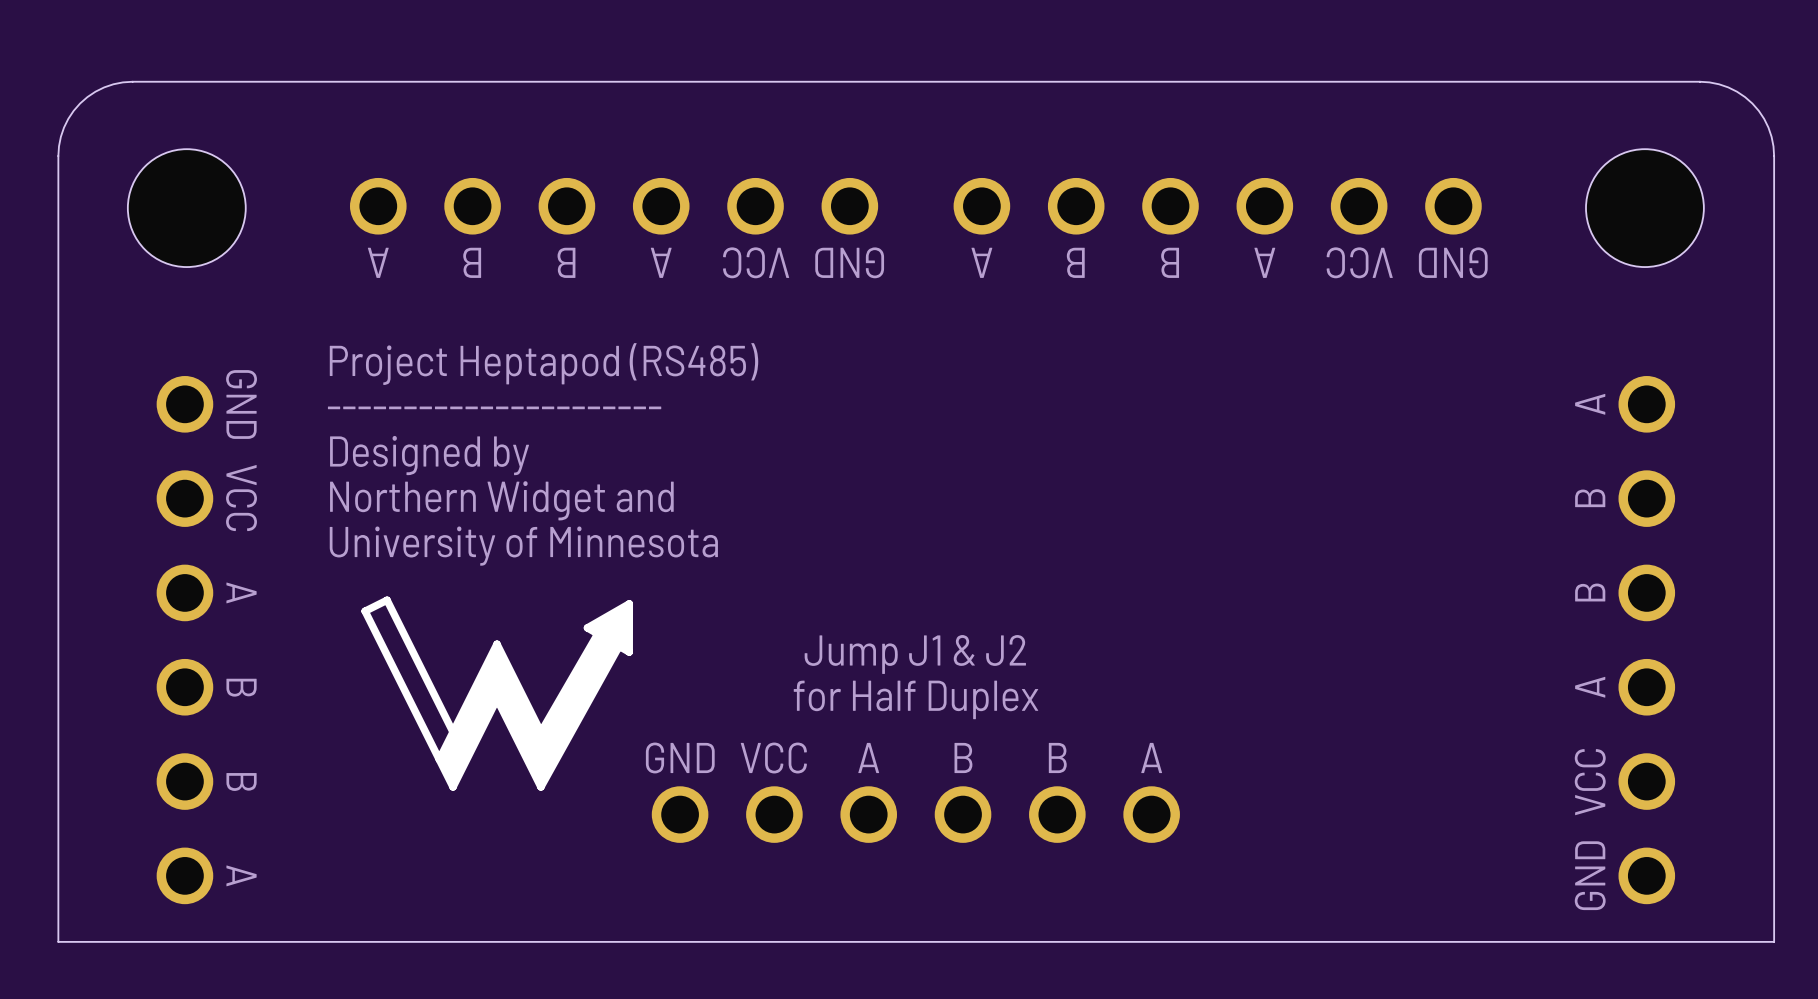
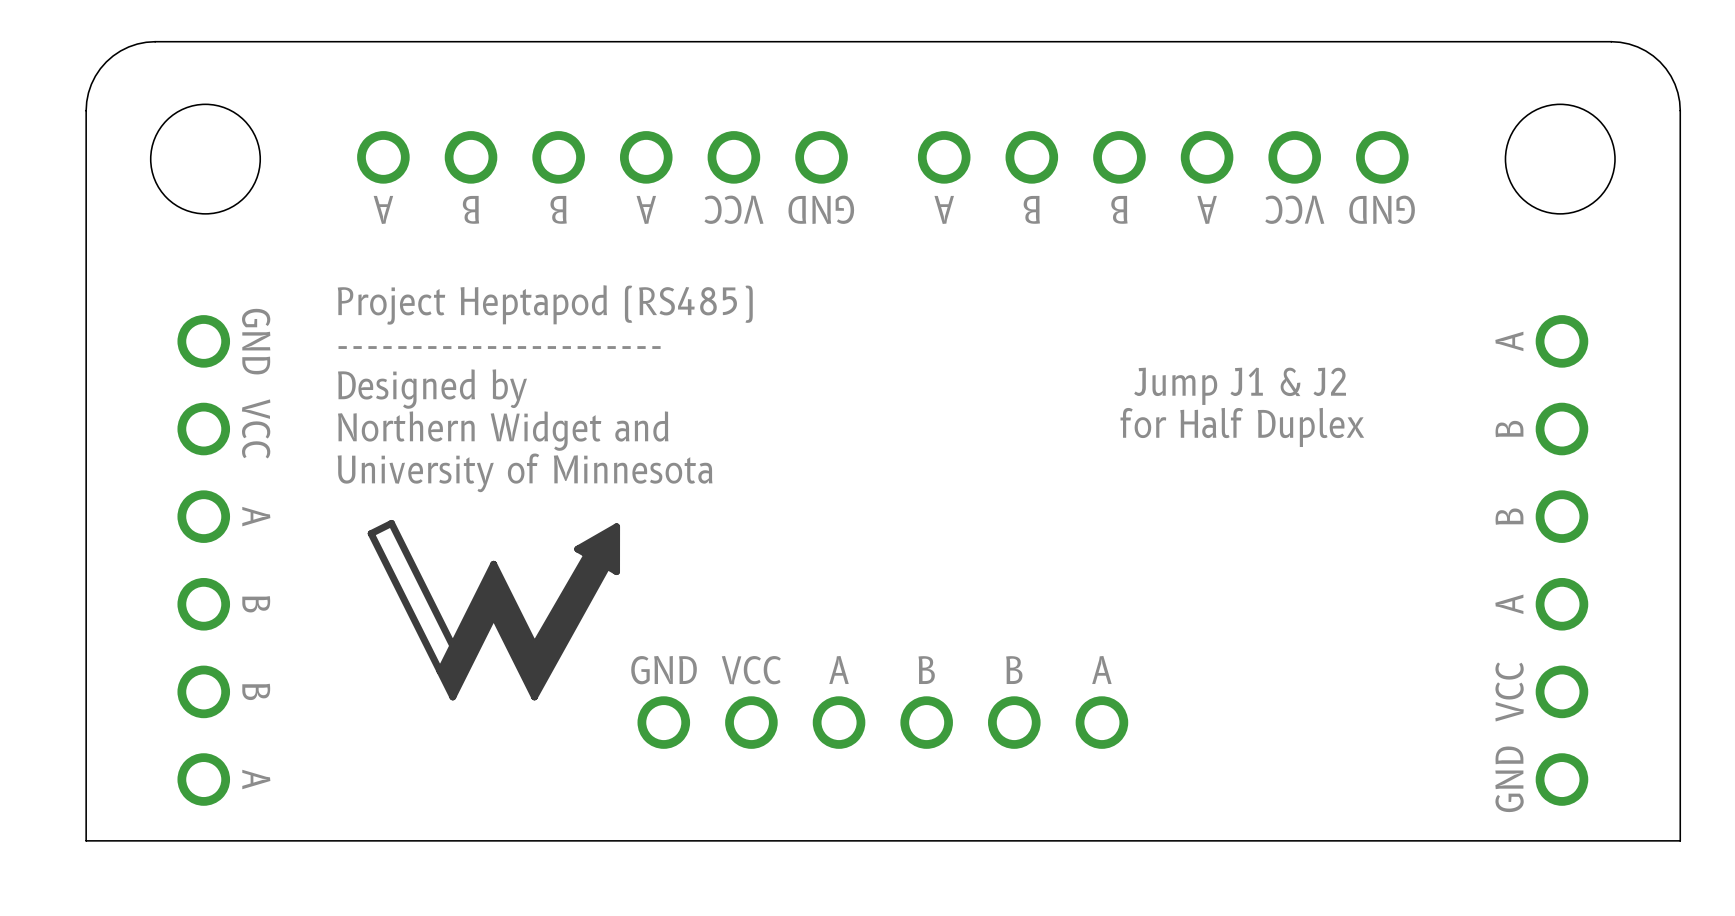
text position: Jump J1 & J2 (915, 654) -> Jump J1 & J2 (1240, 386)
text position: for Half Duplex (916, 699) -> for Half Duplex (1242, 427)

